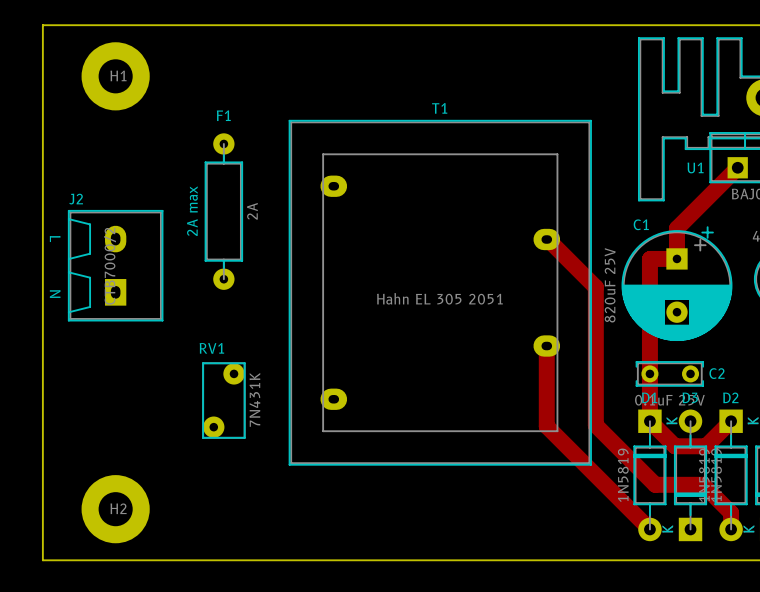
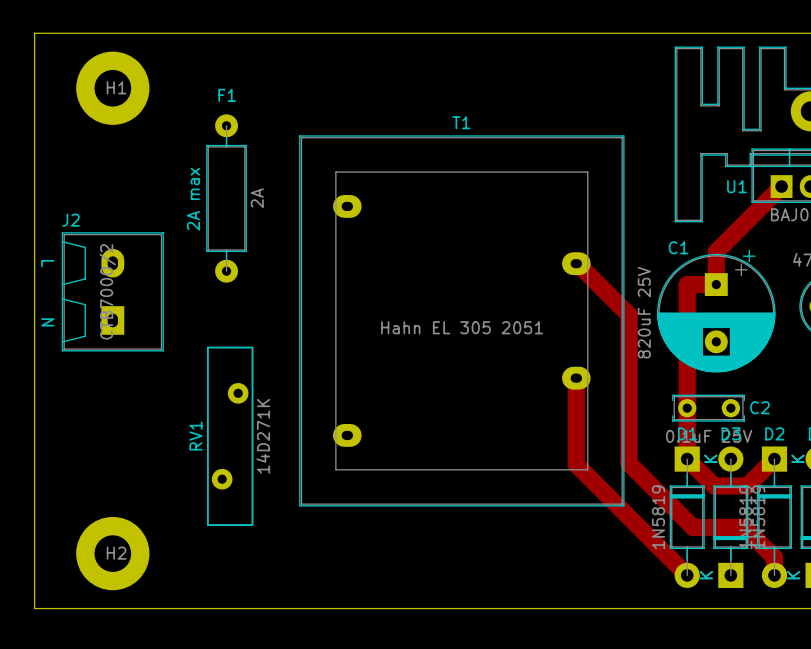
text position: 2A max (192, 211) -> 2A max (193, 199)
F1 position: (223, 211) -> (226, 198)
RV1 name position: RV1 (211, 348) -> RV1 (195, 436)
RV1 footprint: [202, 362, 246, 439] -> [206, 346, 254, 526]
RV1 value: 7N431K (254, 399) -> 14D271K (263, 436)

